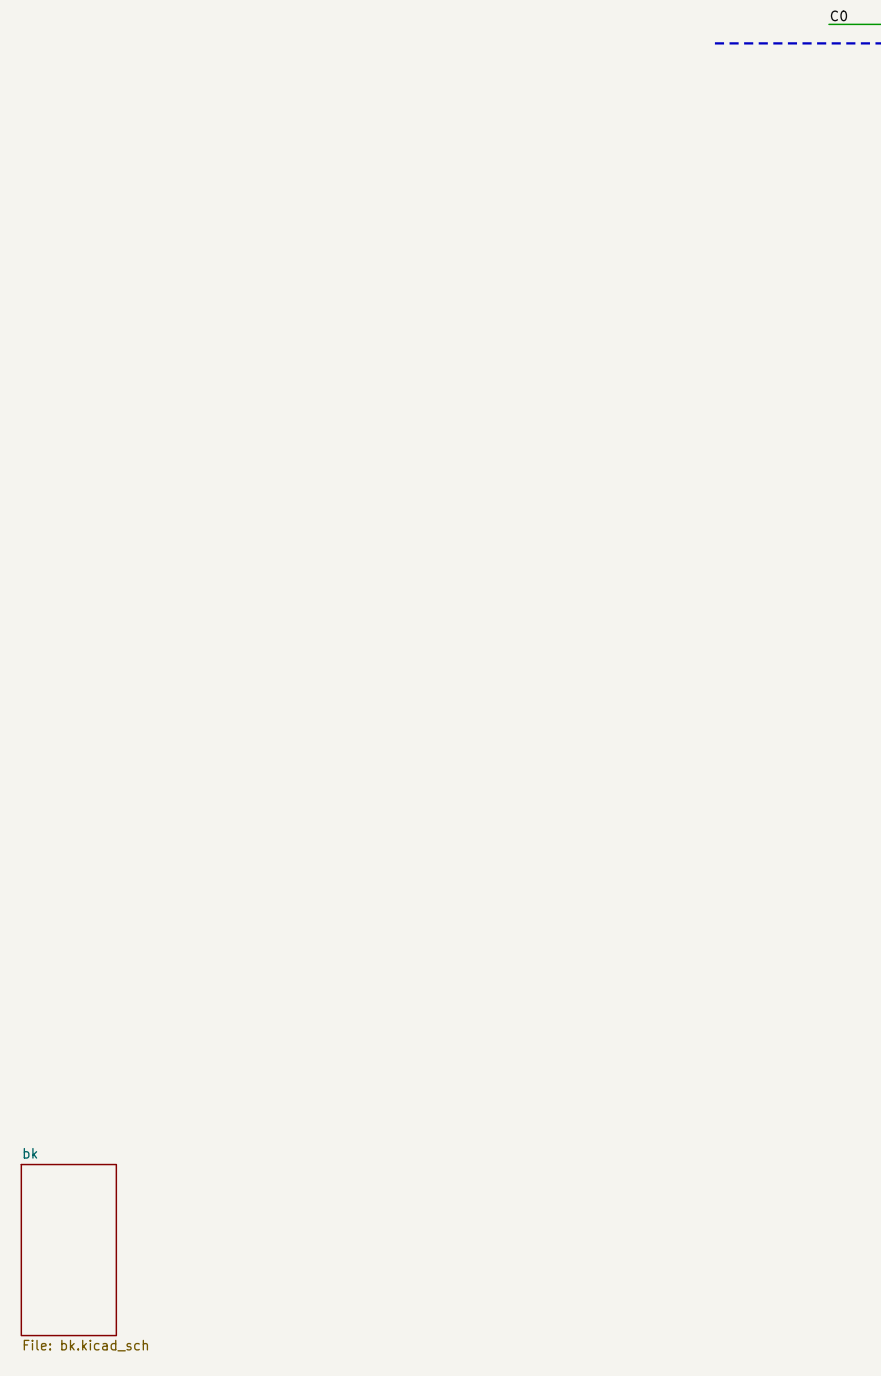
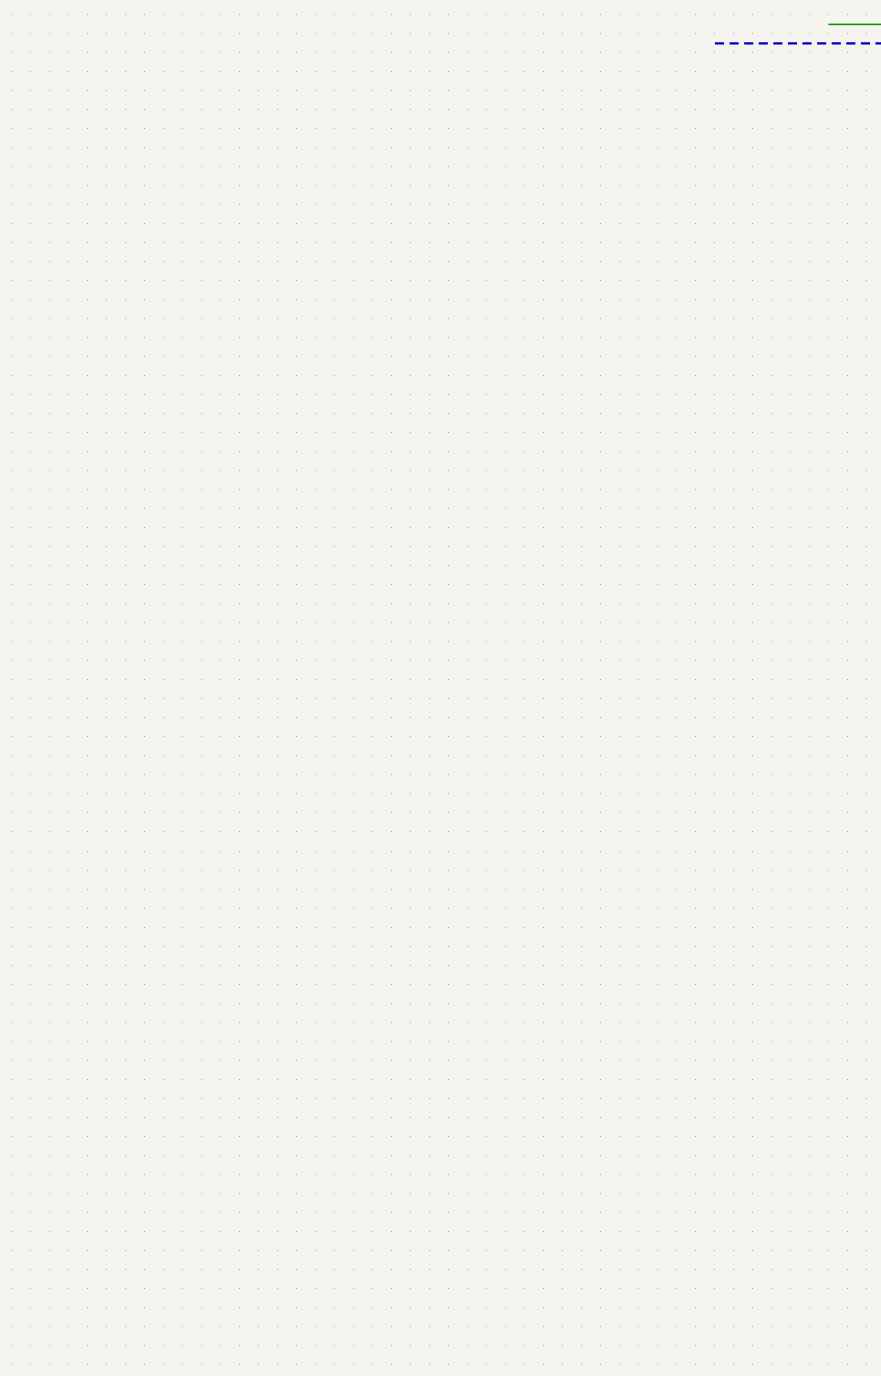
label: C0 (838, 15) -> none
sheet bk: File: bk.kicad_sch (68, 1250) -> none

